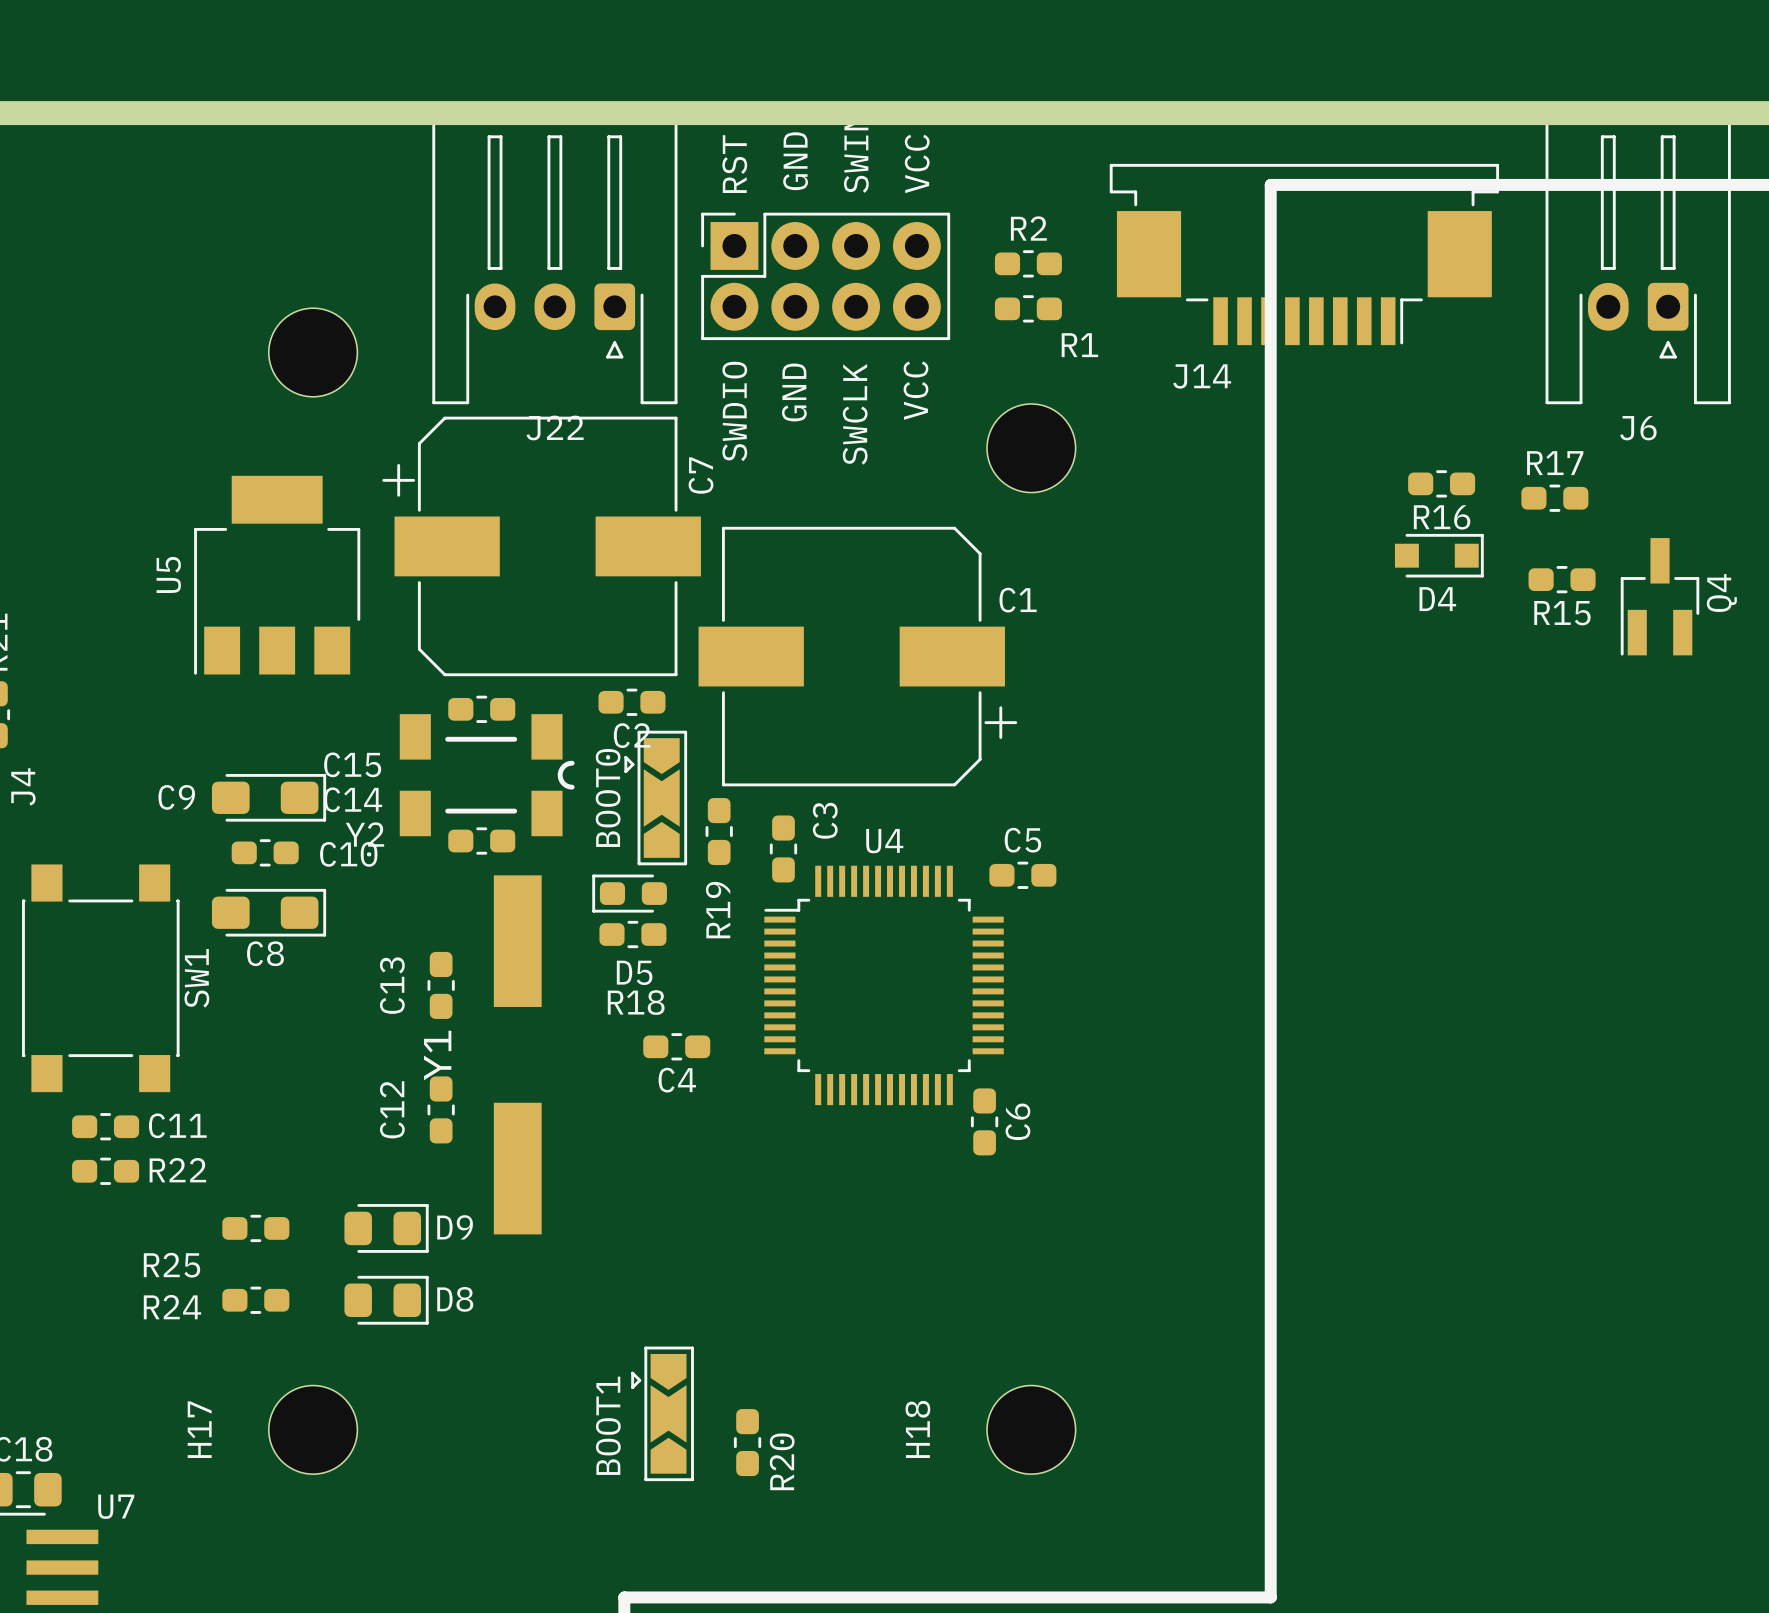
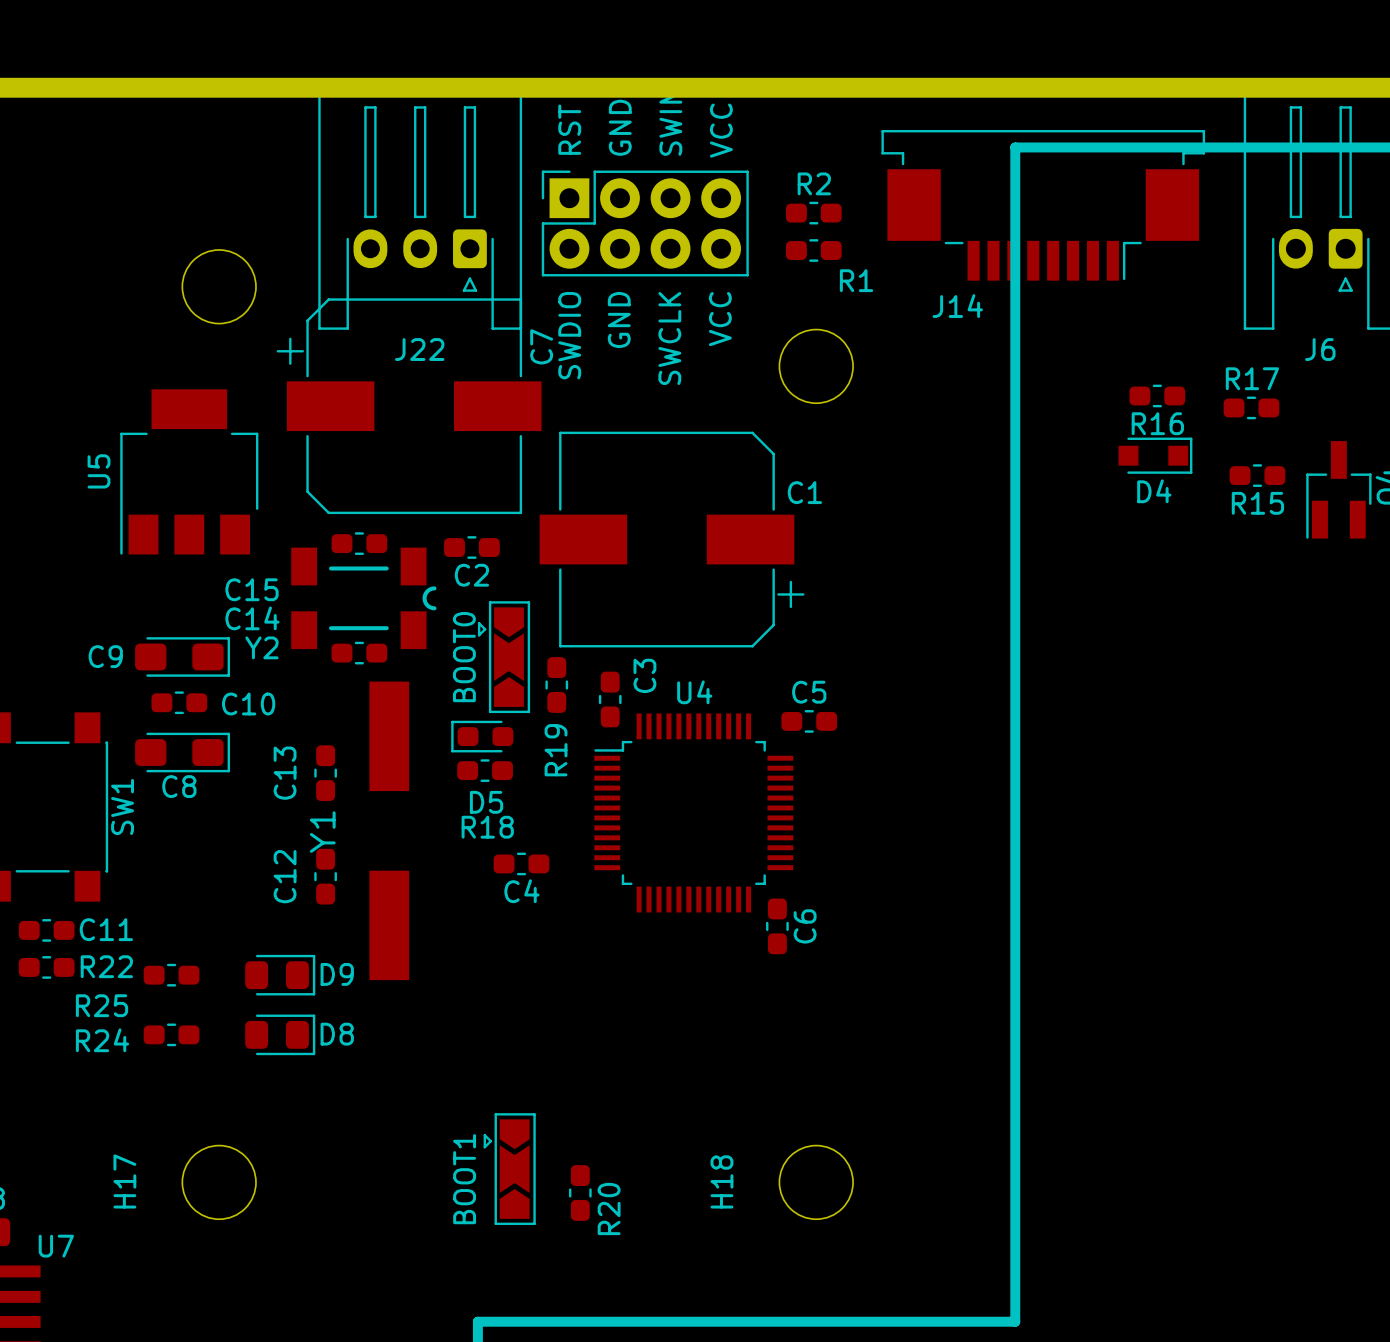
C7 position: (541, 546) -> (409, 406)
C2 position: (631, 702) -> (471, 547)
C15 position: (481, 709) -> (359, 543)
Y2 position: (487, 775) -> (363, 598)
C14 position: (481, 841) -> (359, 653)
C13 position: (441, 985) -> (325, 773)
Y1 position: (517, 1054) -> (389, 830)
C12 position: (441, 1109) -> (325, 876)
R25 position: (255, 1228) -> (171, 975)
D9 position: (386, 1228) -> (280, 975)
R24 position: (255, 1300) -> (171, 1034)
D8 position: (386, 1300) -> (280, 1034)

